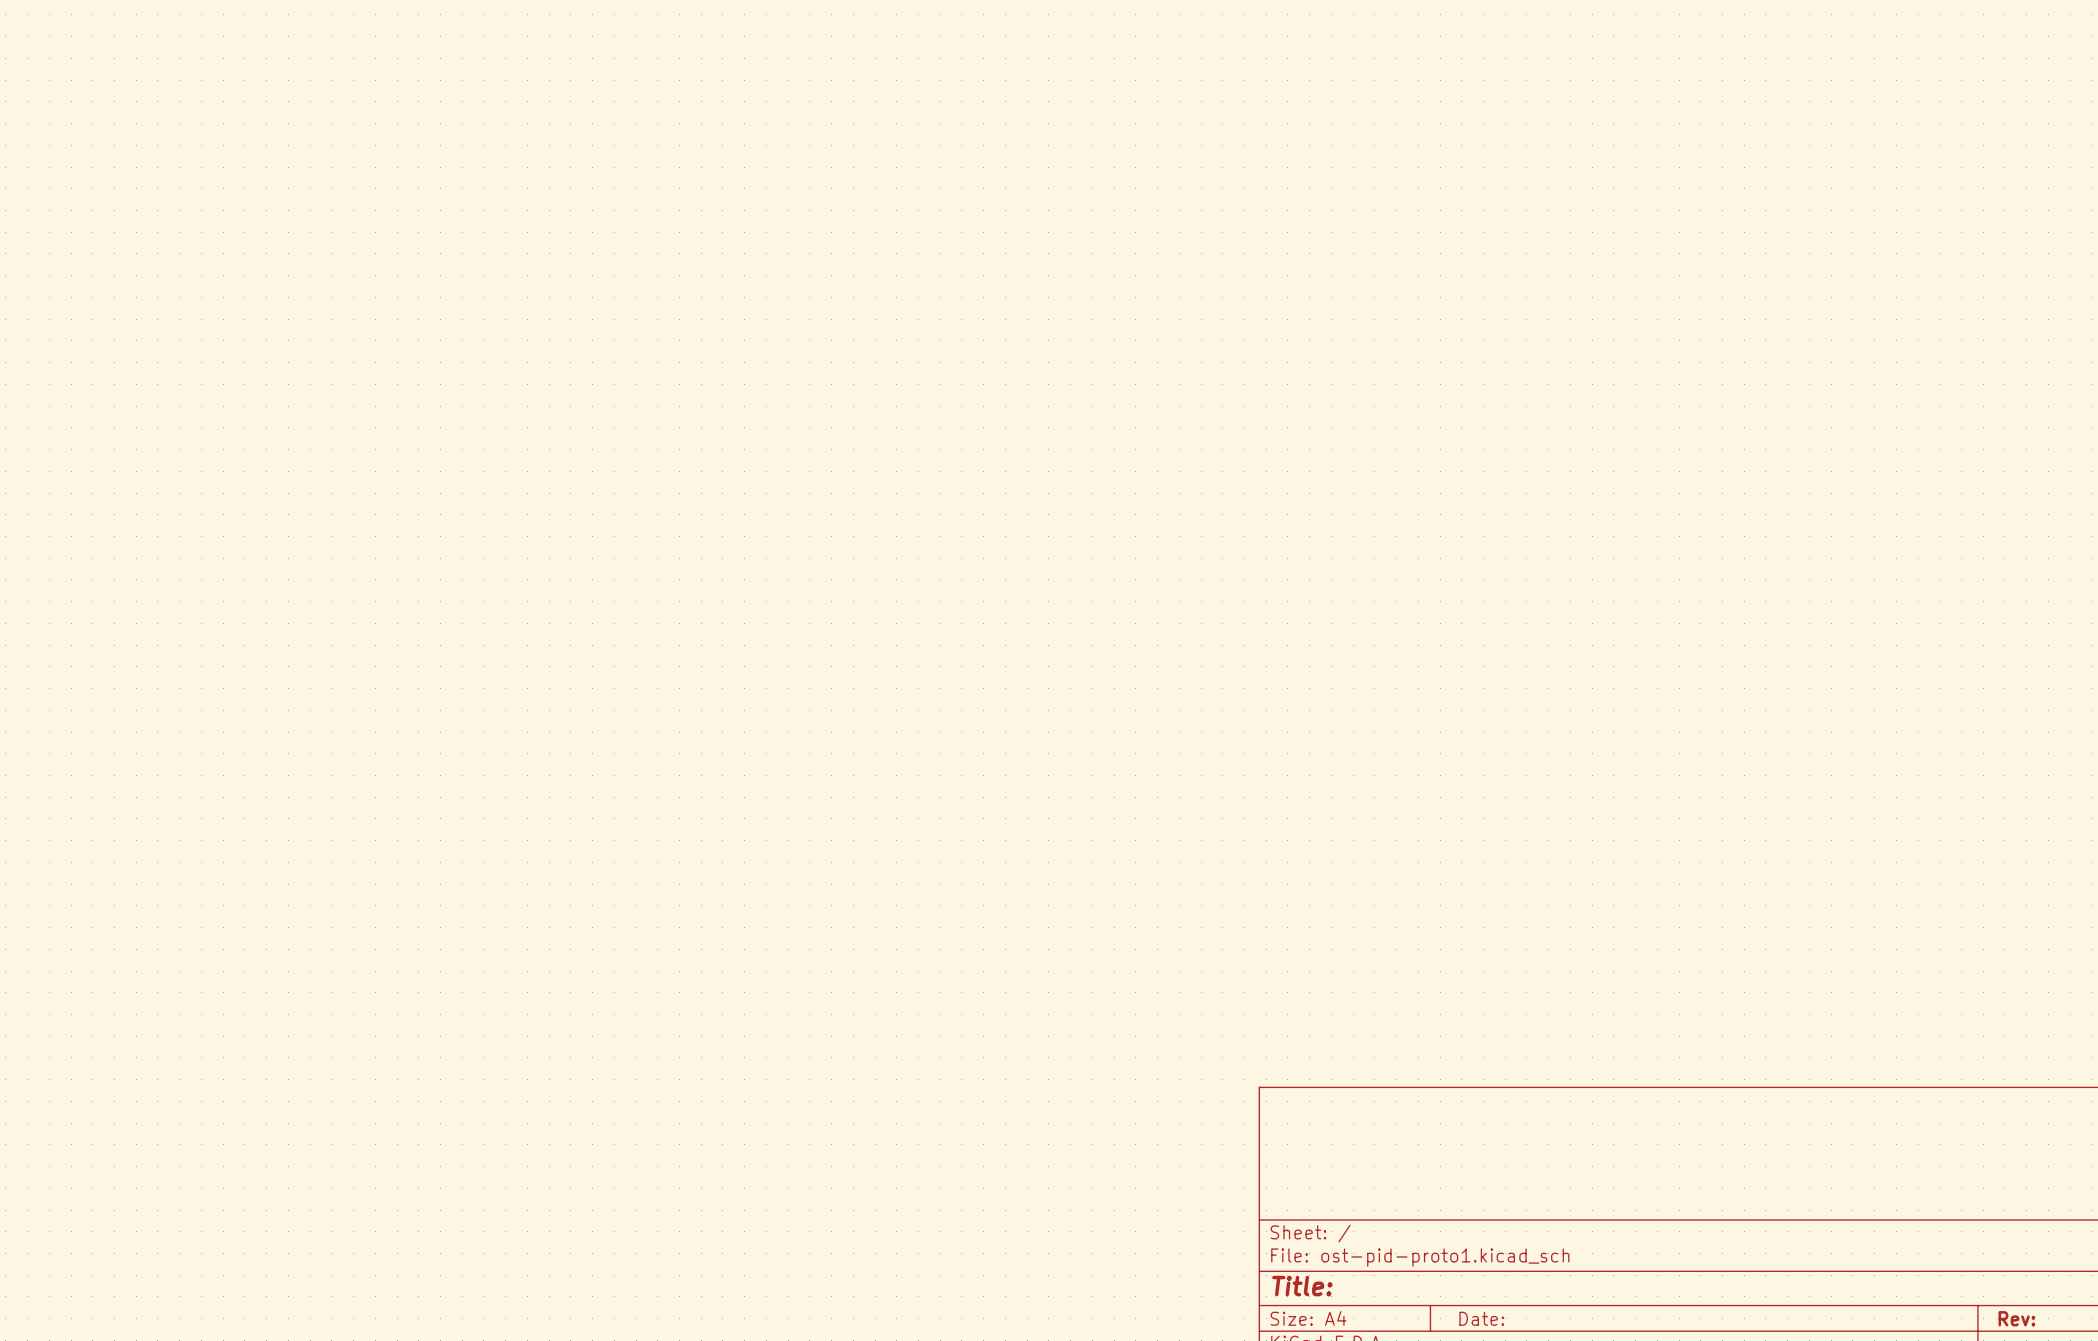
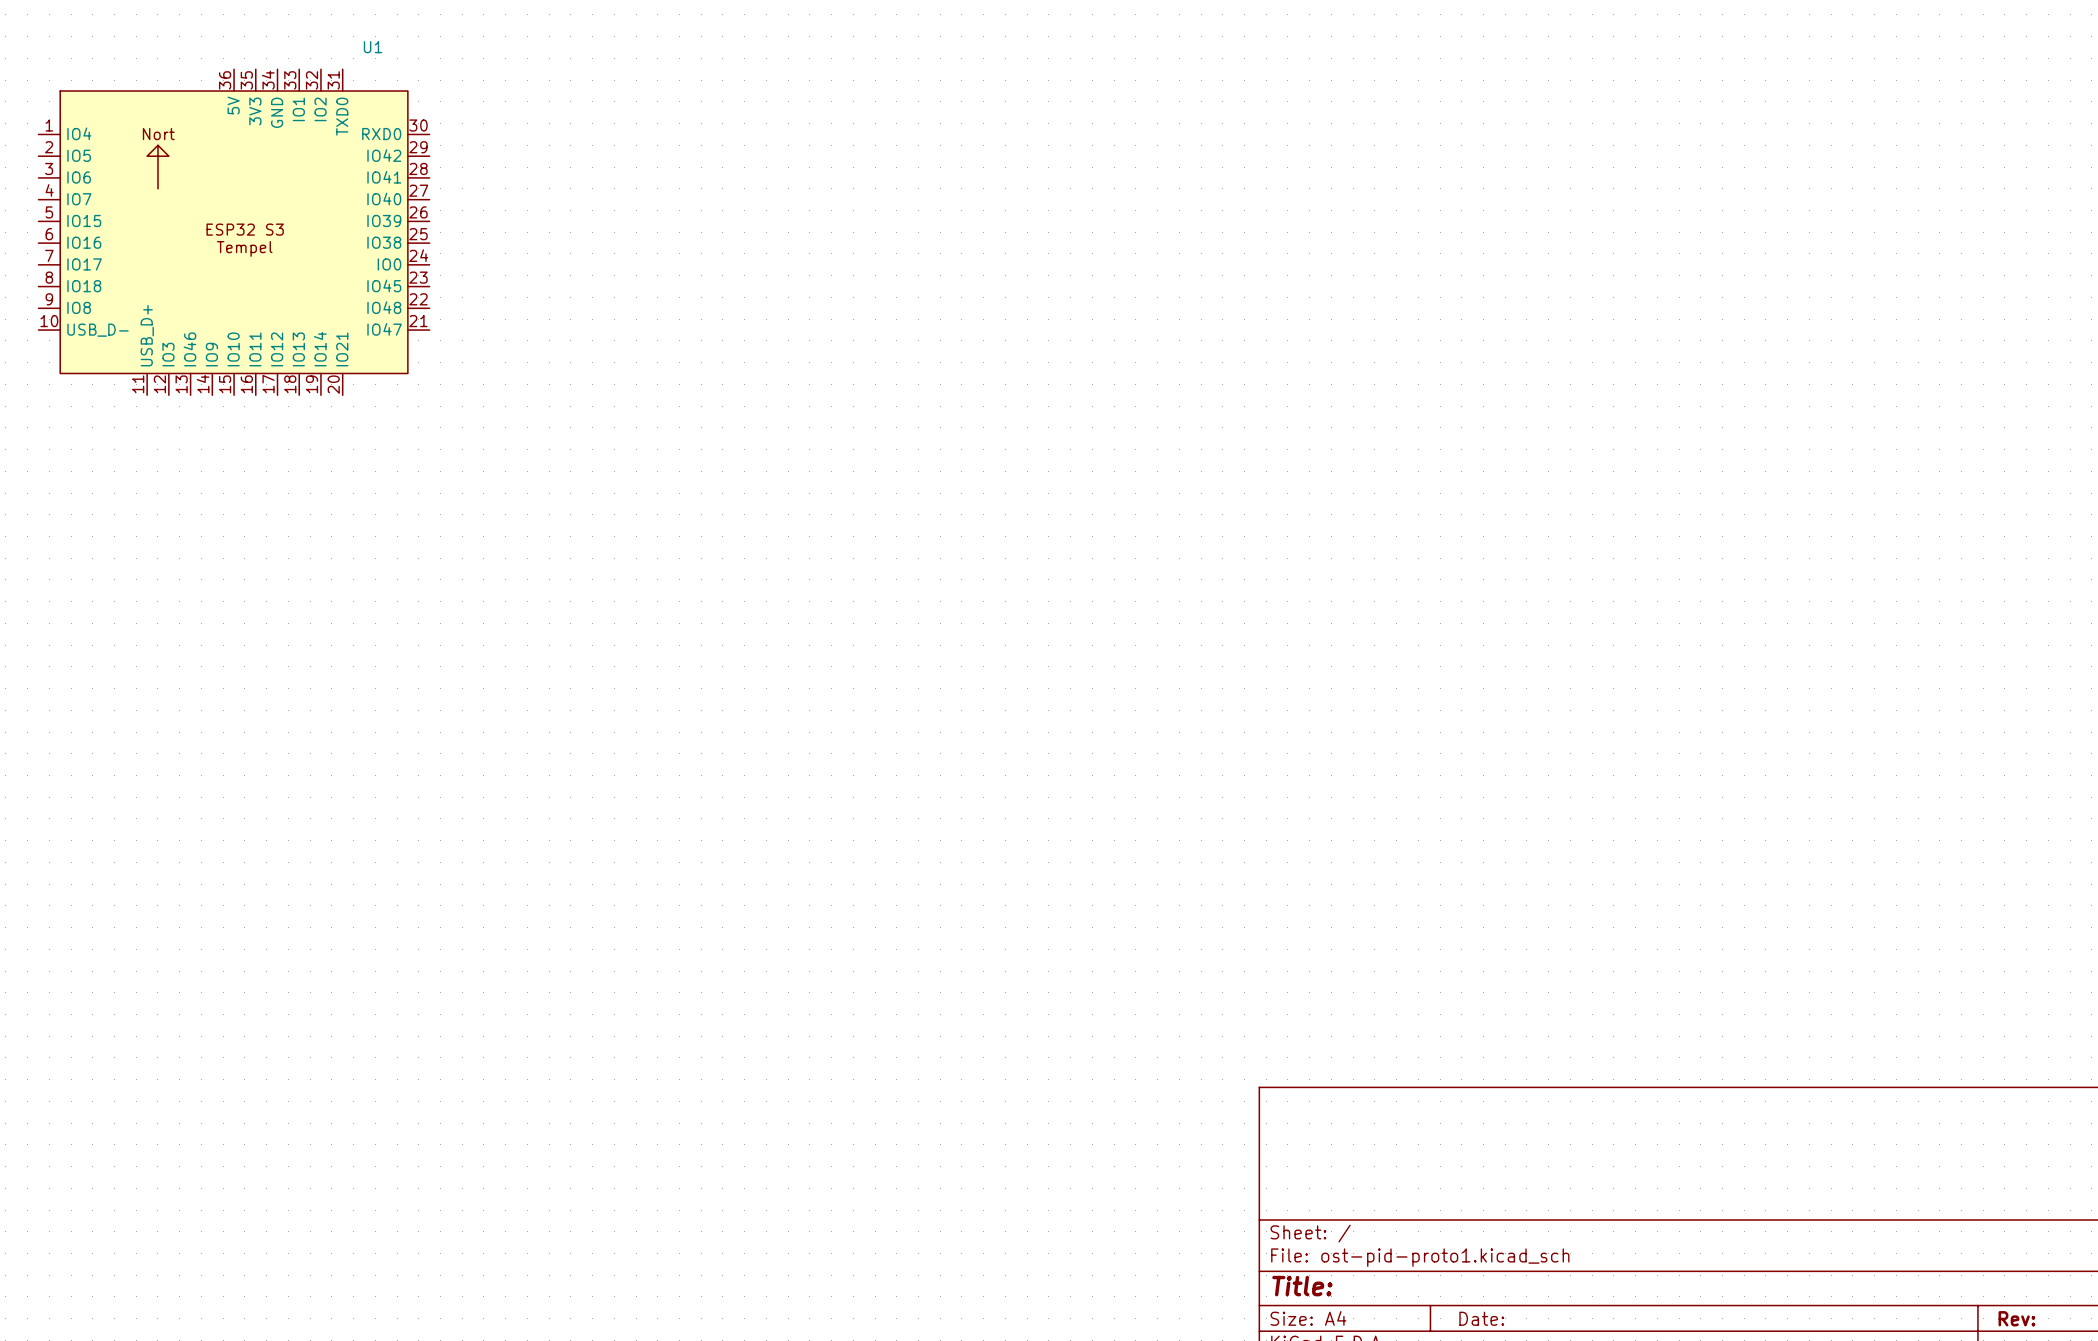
U1: none -> (234, 232)

